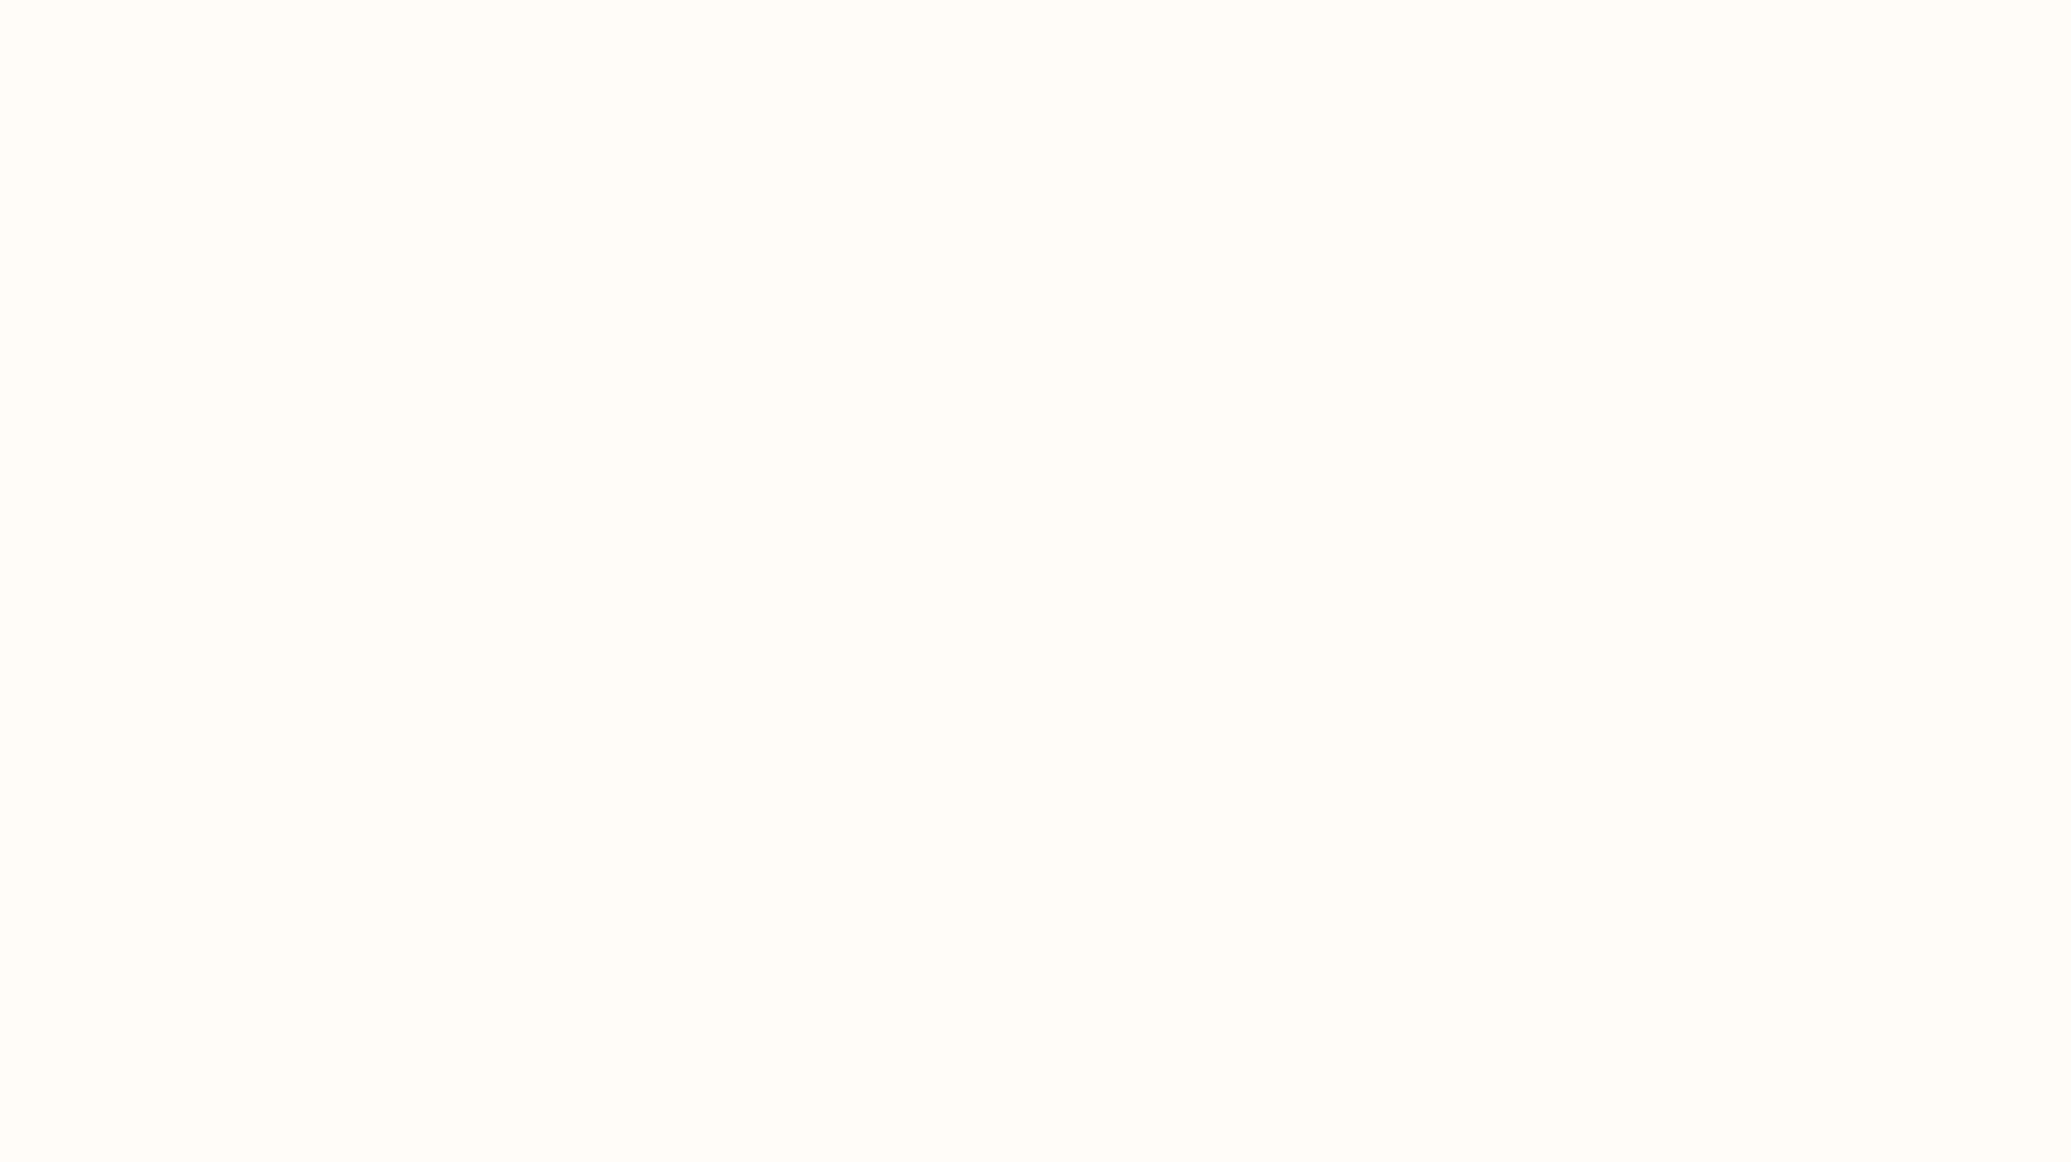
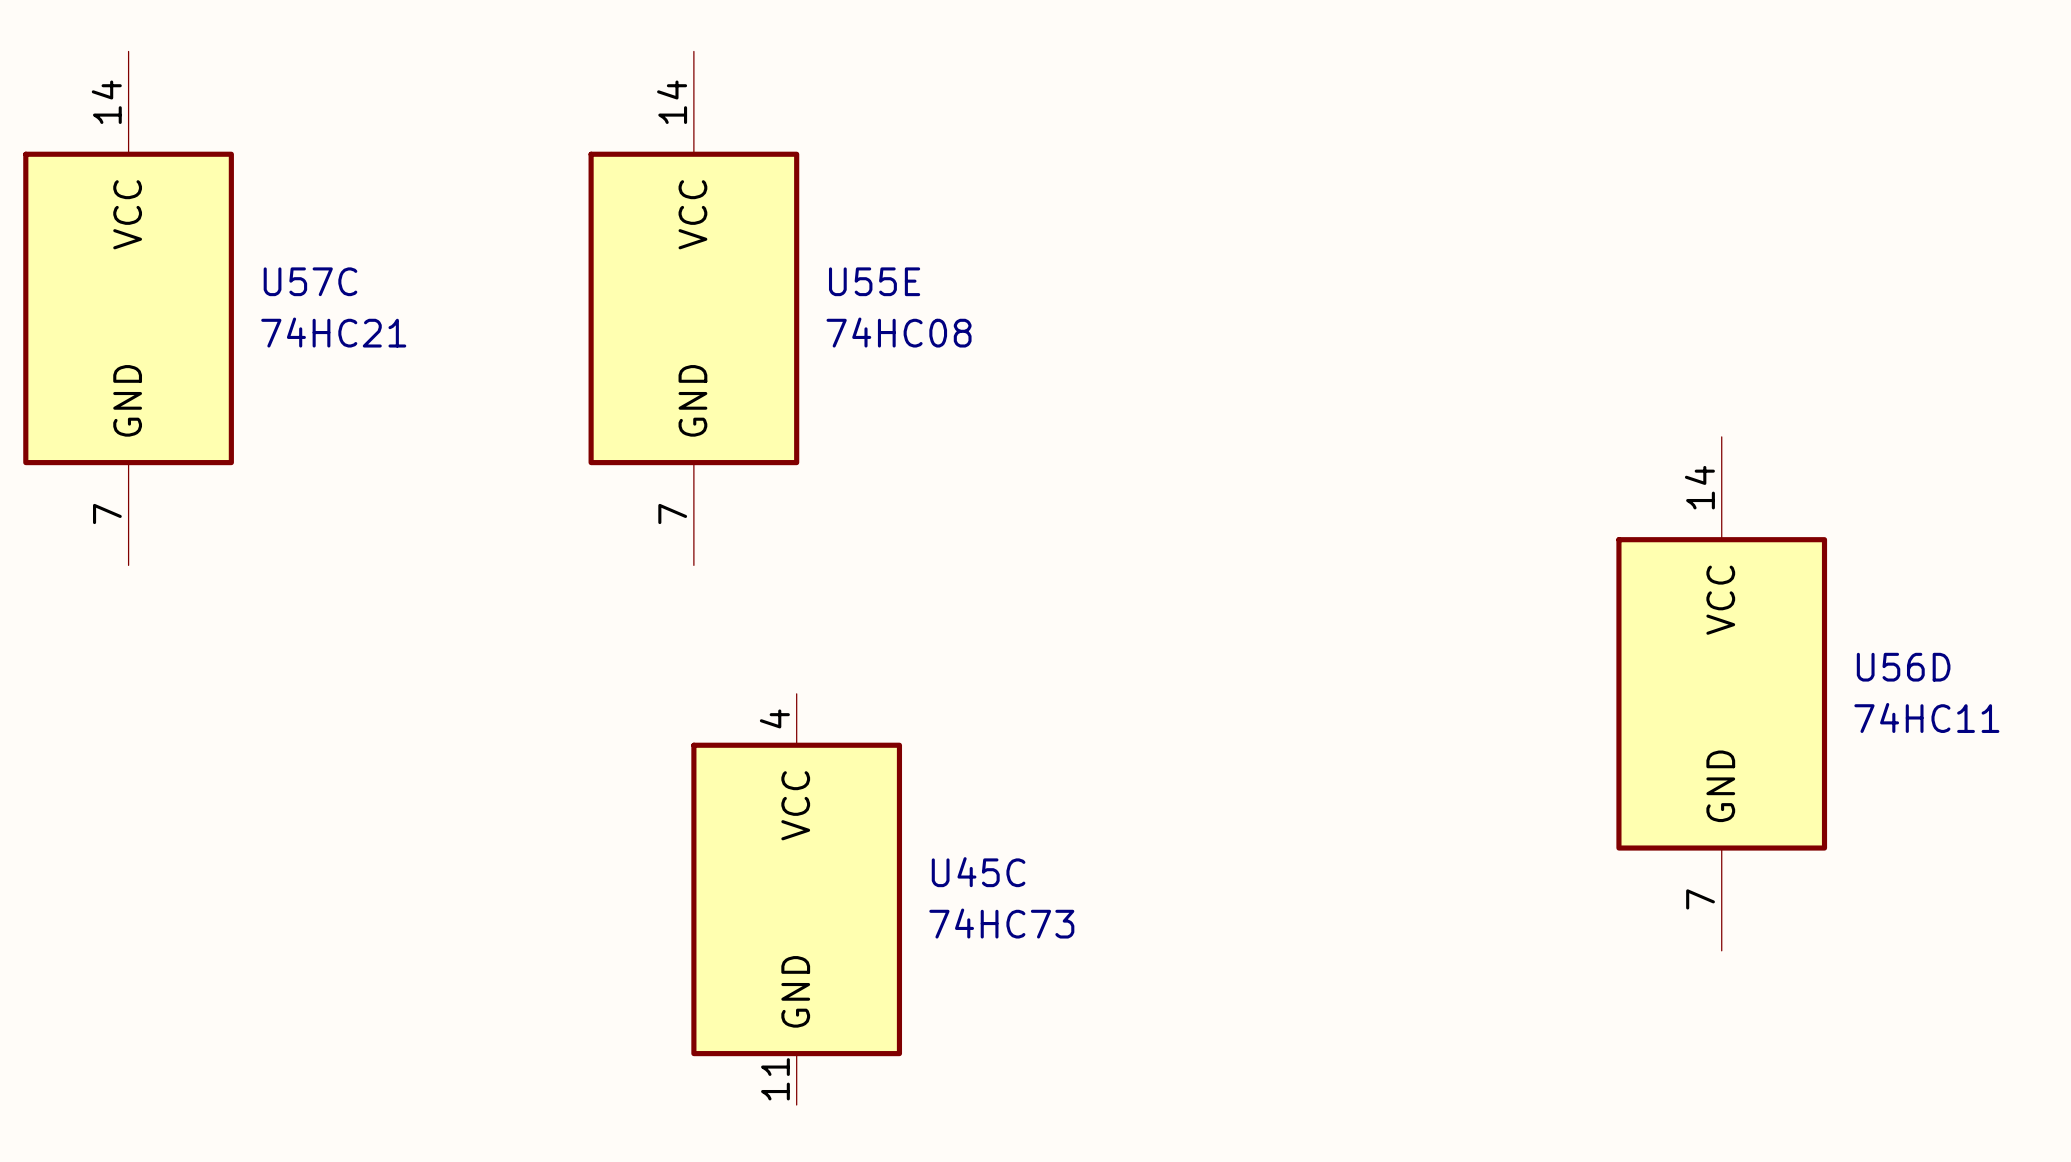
U57C: none -> 74HC21 (128, 308)
U55E: none -> 74HC08 (693, 308)
U56D: none -> 74HC11 (1721, 693)
U45C: none -> 74HC73 (796, 899)

